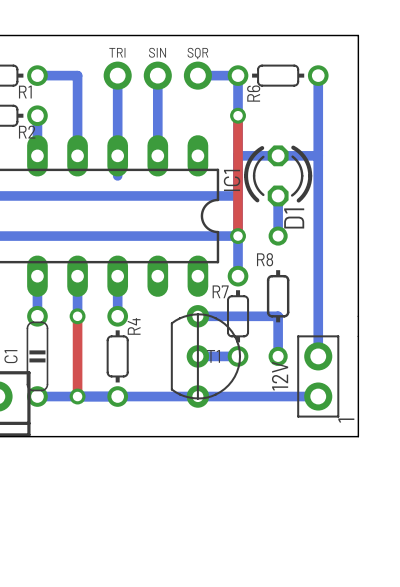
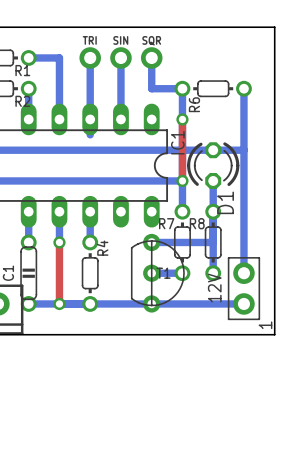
bottom track: (197, 75) (238, 75) (238, 115) -> (151, 57) (151, 88) (182, 88)
R6 position: (278, 75) -> (213, 88)
bottom track: (318, 75) (318, 115) -> none
top track: (238, 115) (238, 155) -> none
via position: (238, 115) -> (182, 119)
bottom track: (238, 155) (318, 155) -> (182, 150) (243, 150)
D1 position: (278, 175) -> (213, 165)
bottom track: (278, 195) (278, 236) -> (213, 242) (213, 180)
R8 footprint: [266, 226, 290, 366] -> [204, 203, 222, 282]

